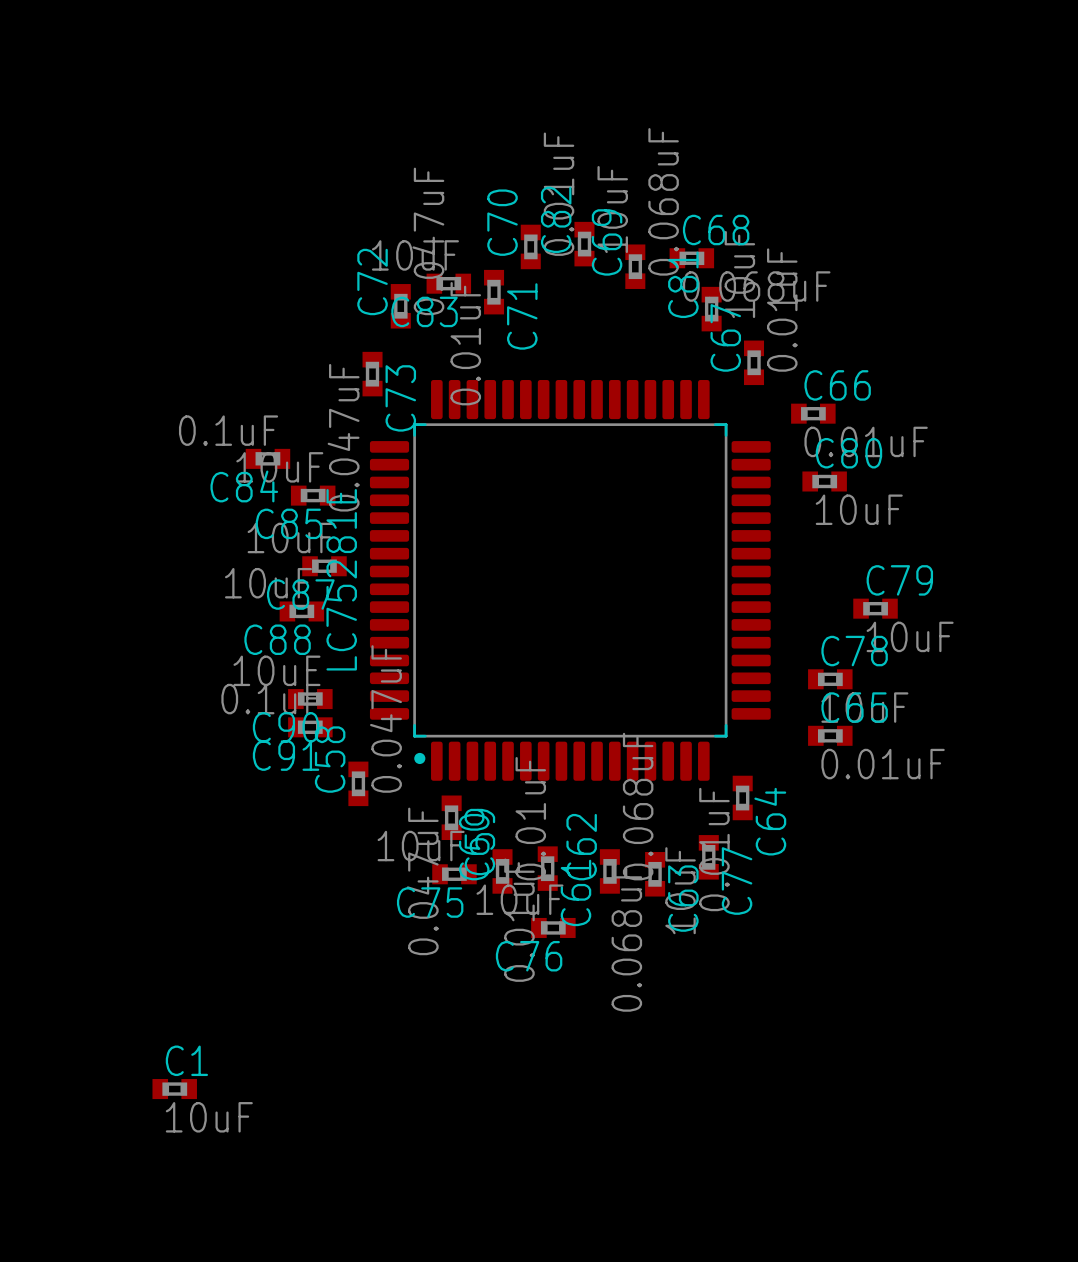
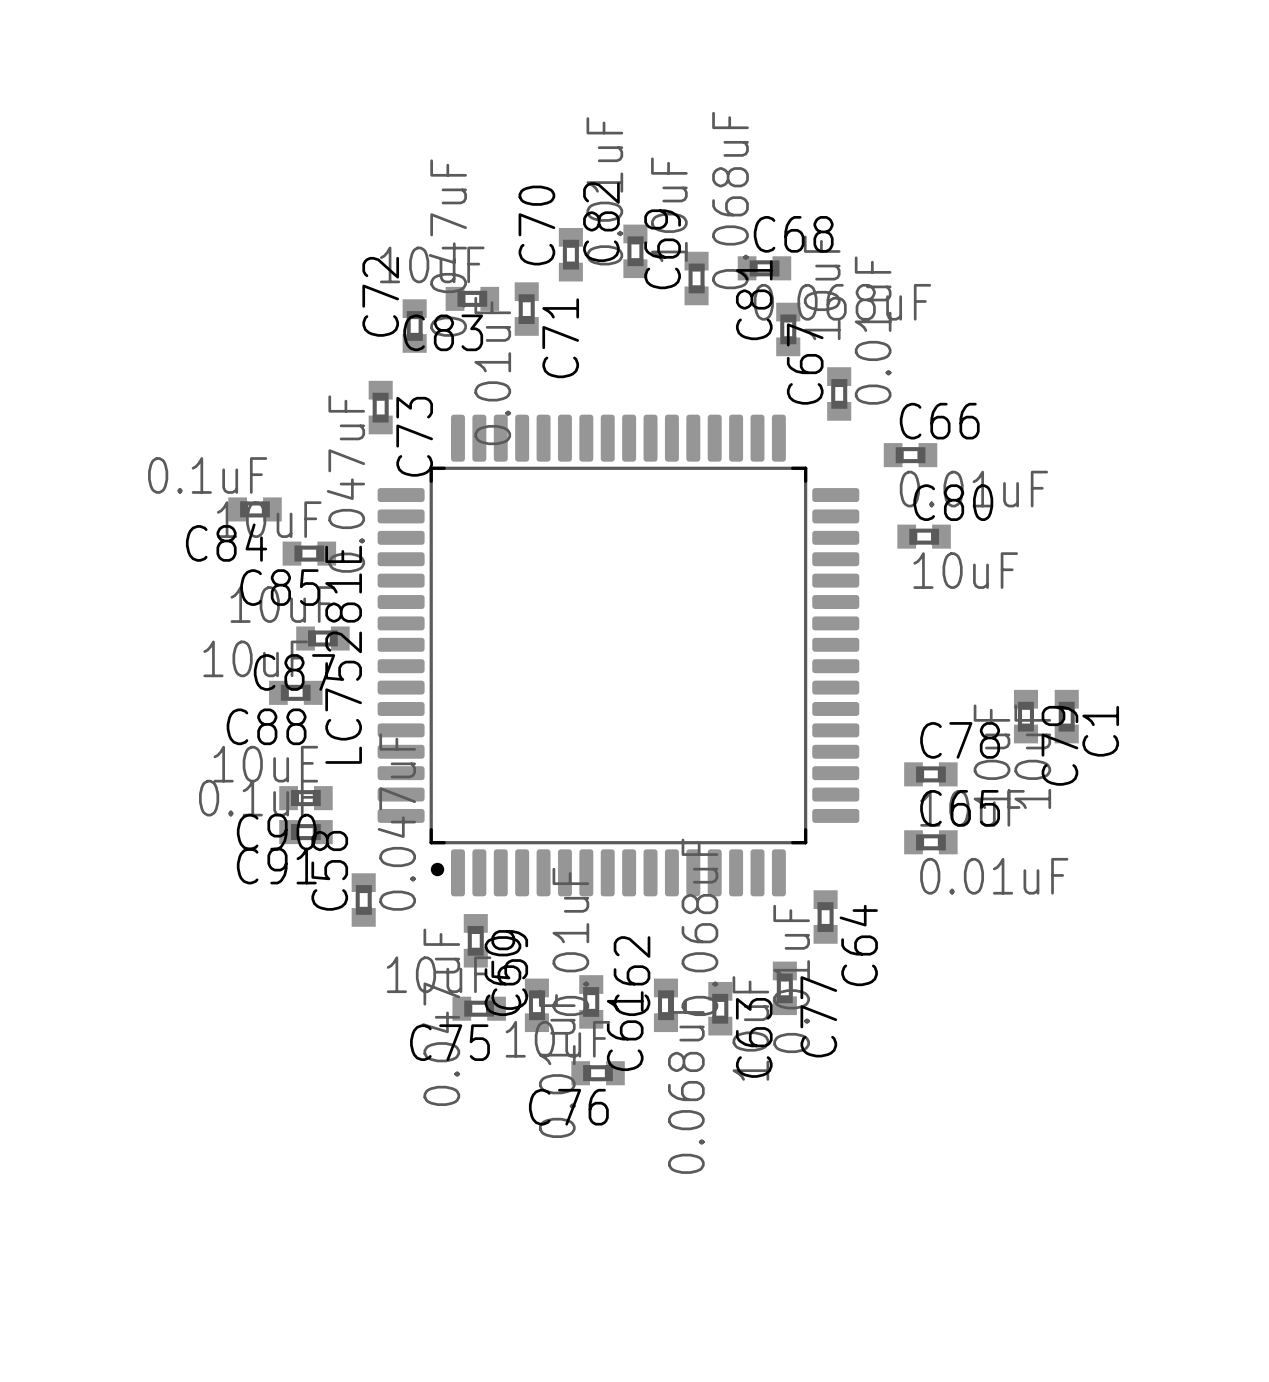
C79 rotation: 0° (875, 608) -> 90° clockwise (1025, 716)
C79 position: (875, 608) -> (1025, 716)
C1 rotation: 0° (174, 1089) -> 90° clockwise (1066, 716)
C1 position: (174, 1089) -> (1066, 716)

